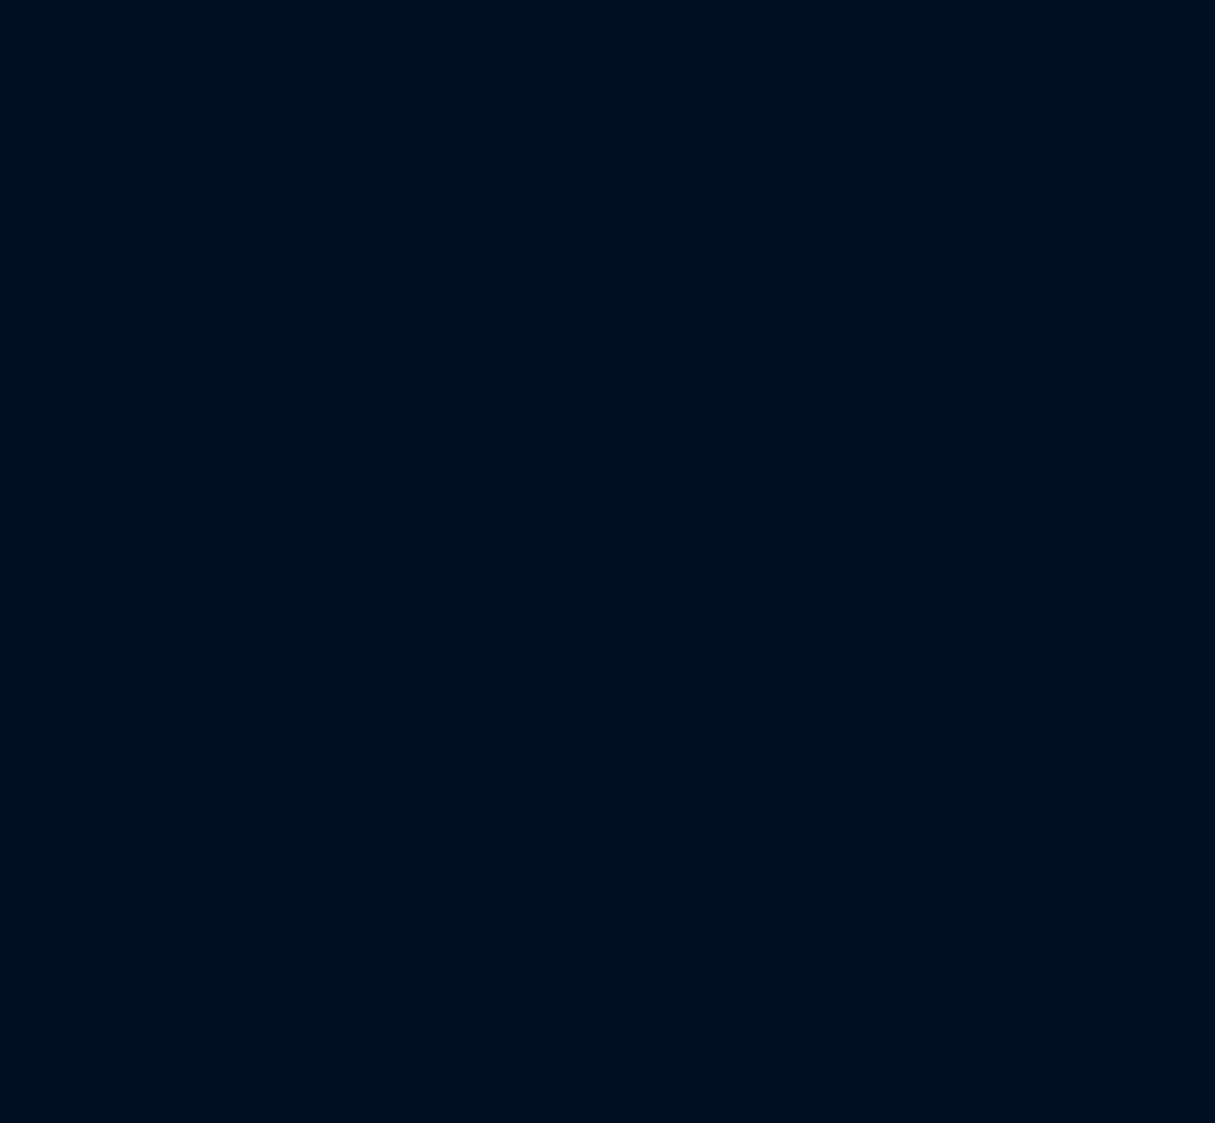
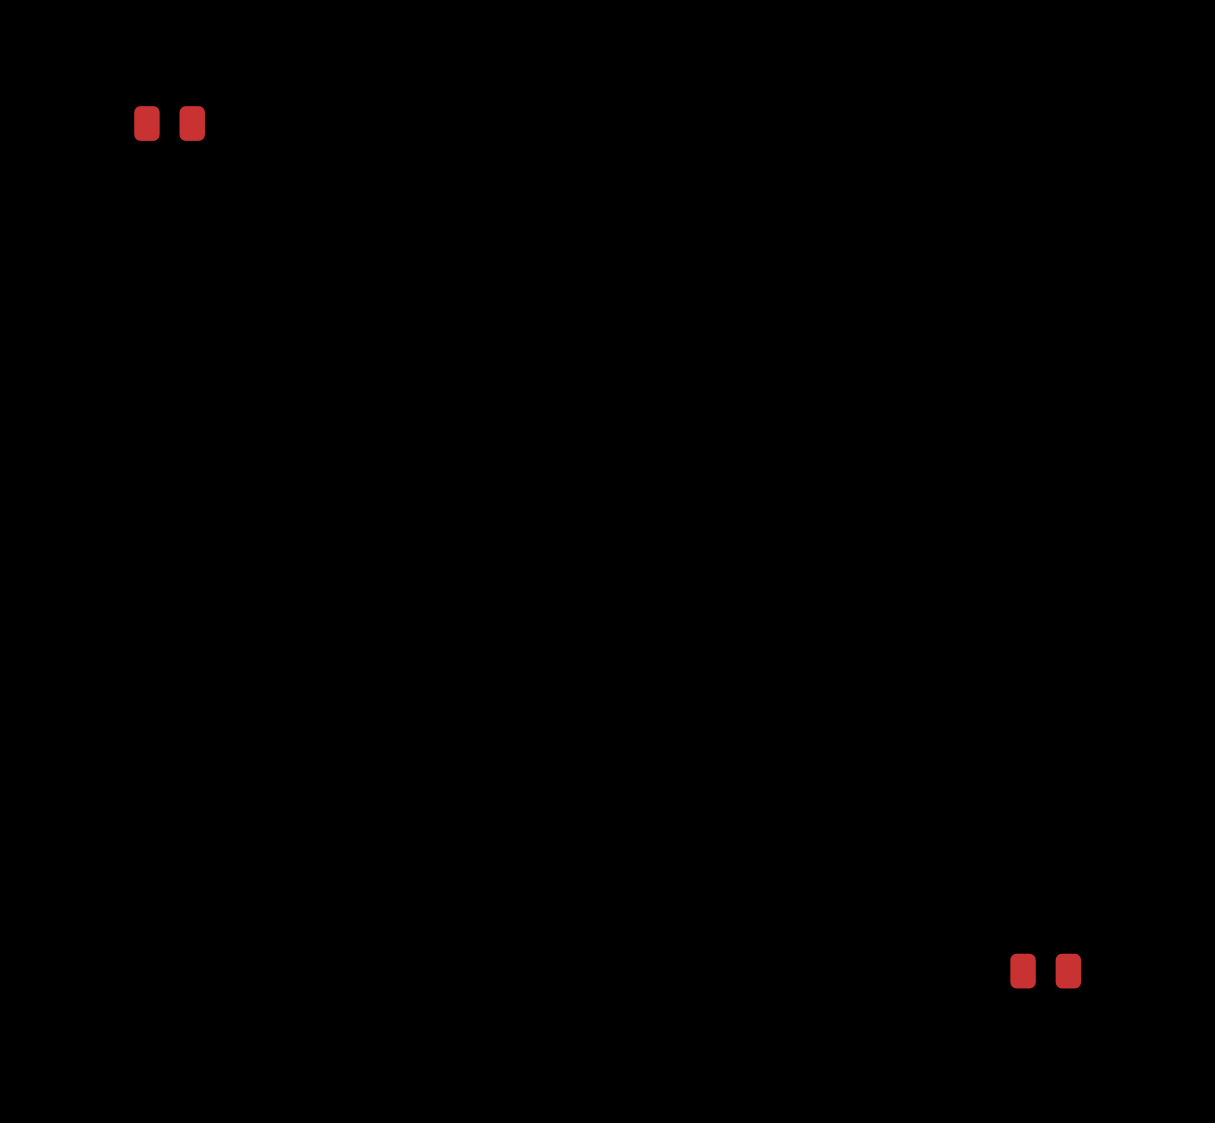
part: none -> (169, 123)
part: none -> (1045, 971)

